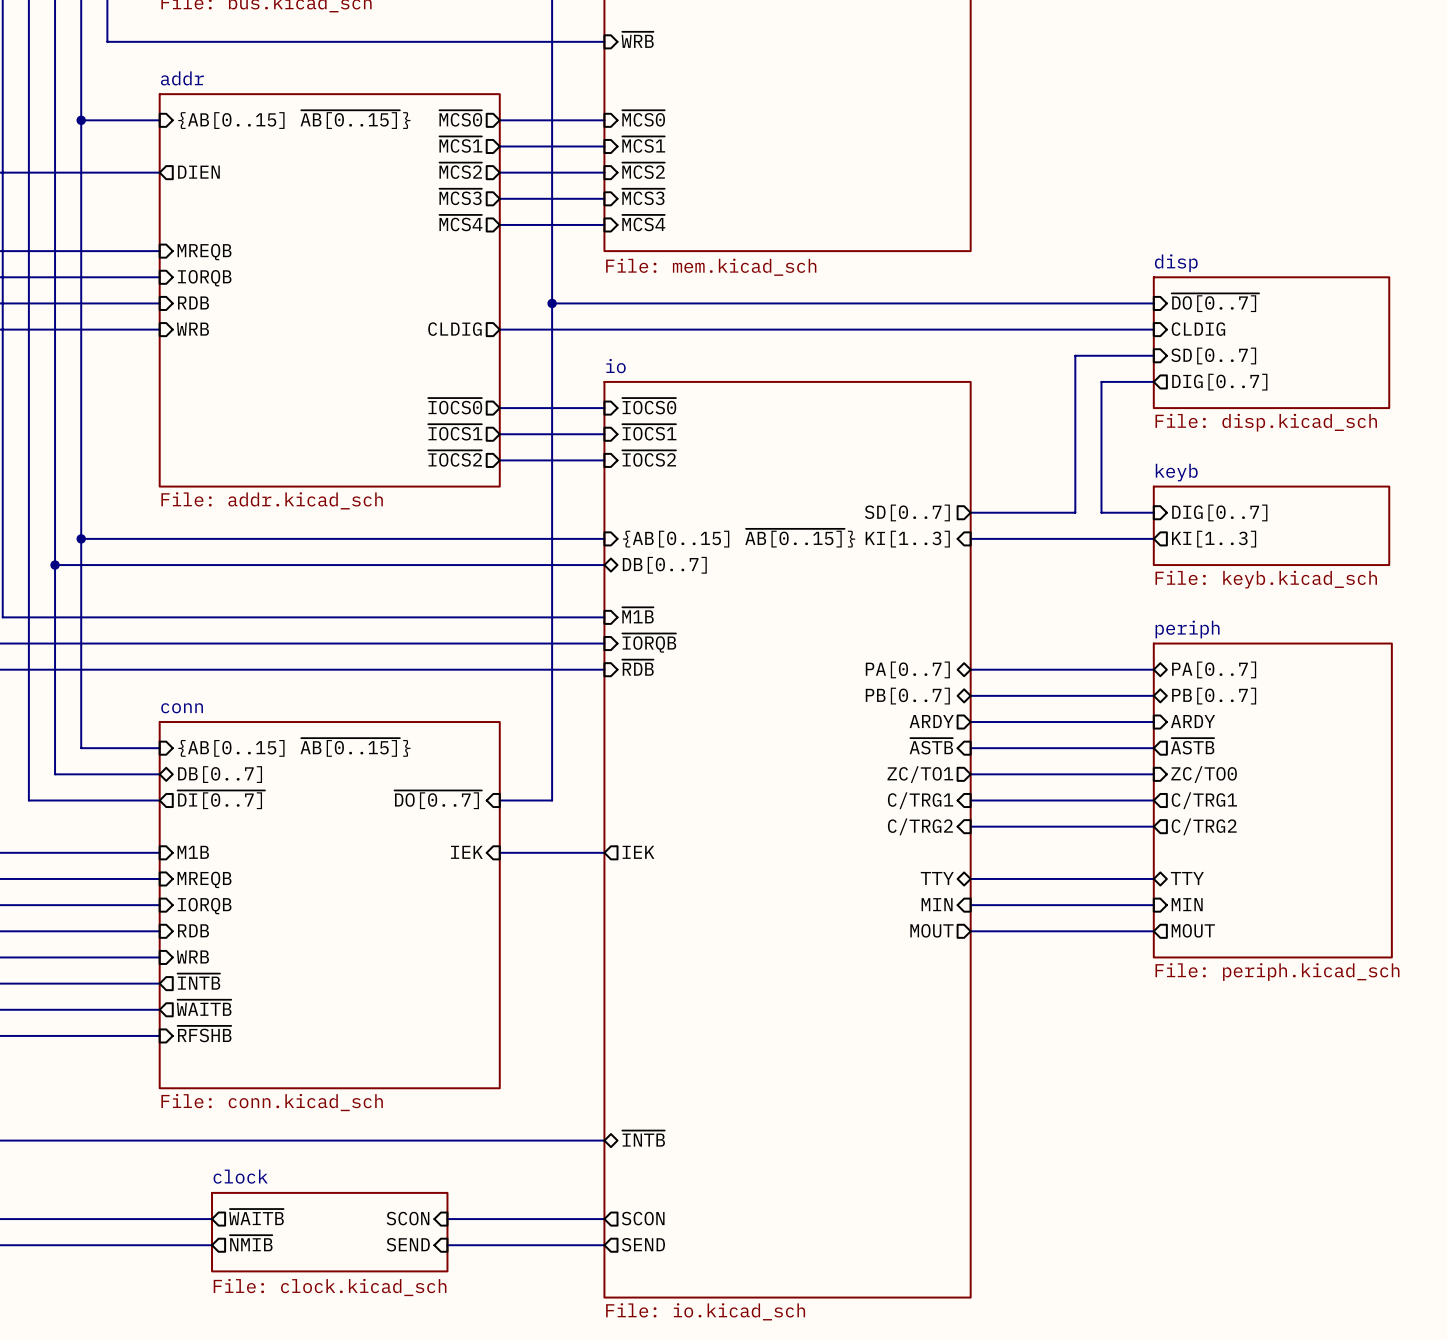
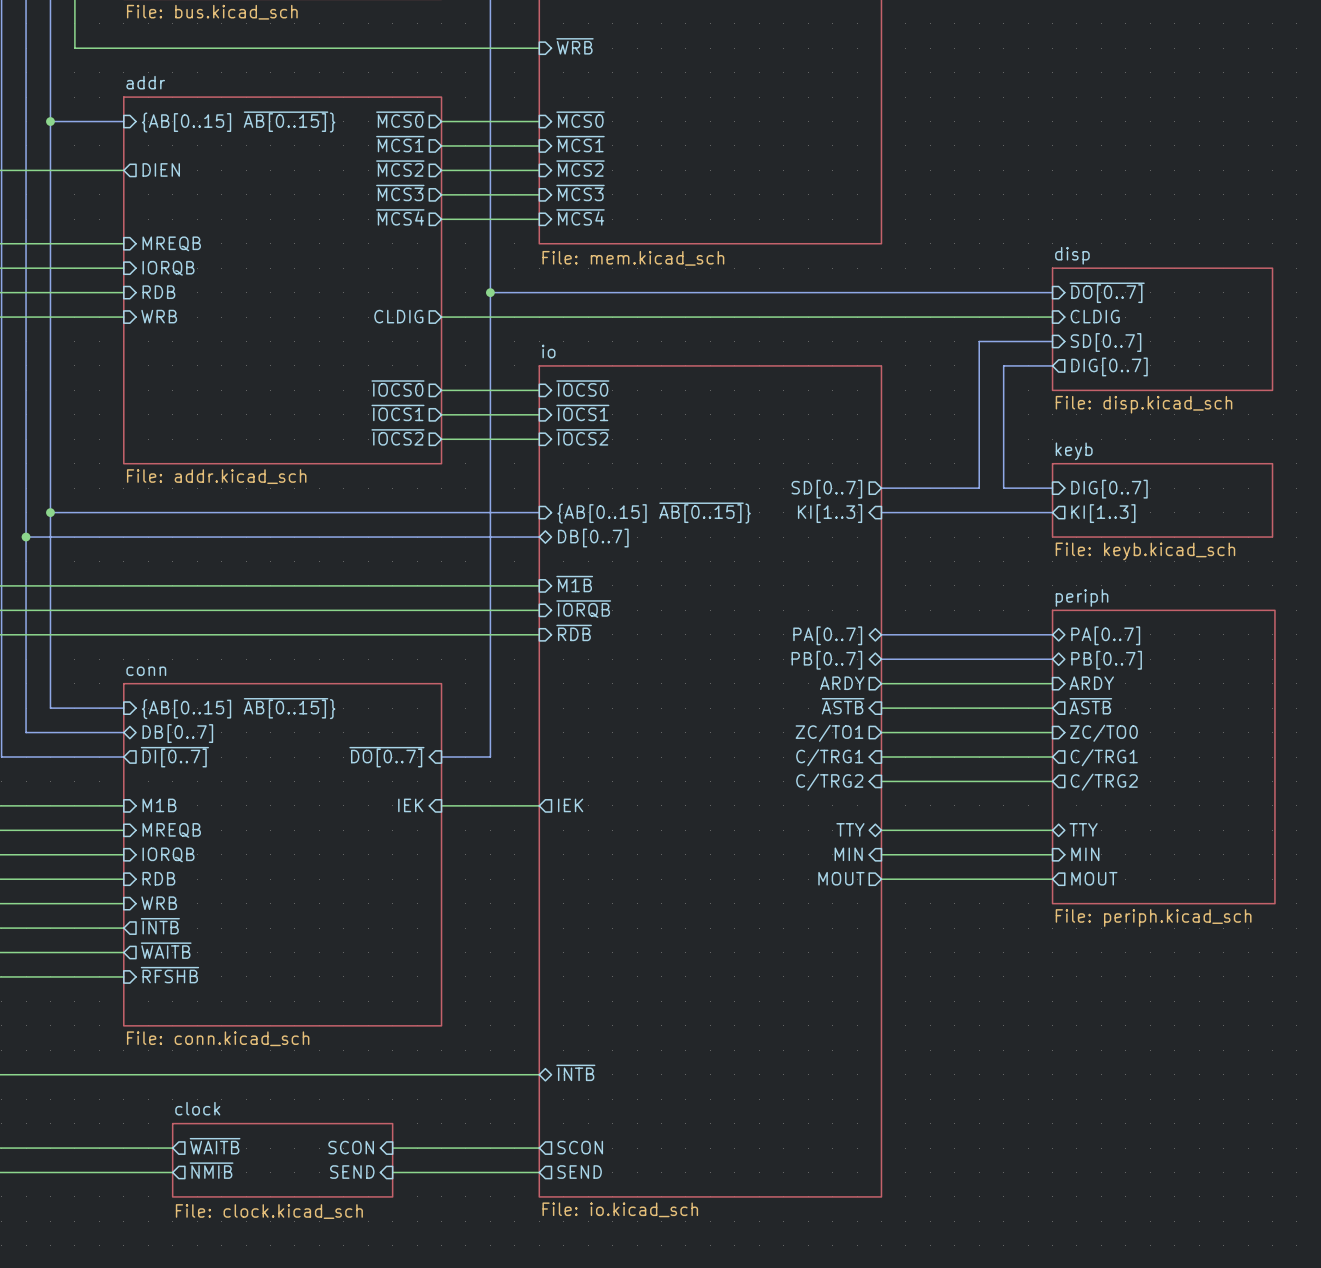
sheet io: none -> File: io.kicad_sch (710, 781)
sheet io: File: io.kicad_sch (787, 839) -> none

